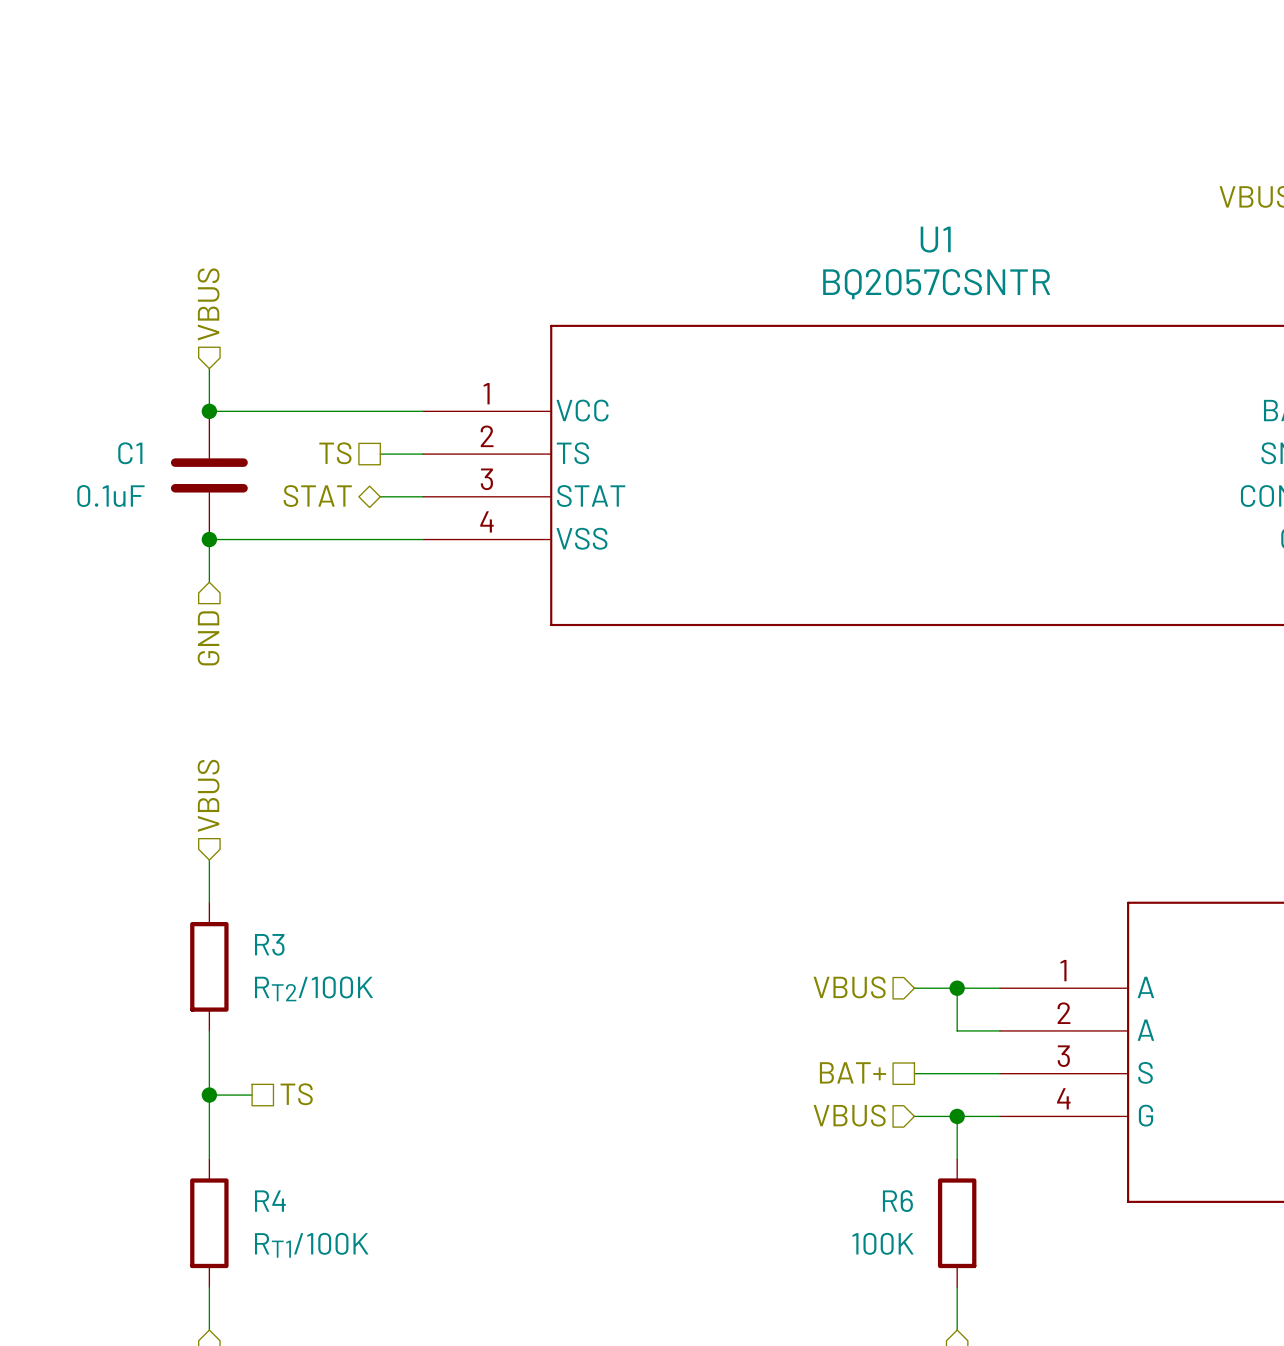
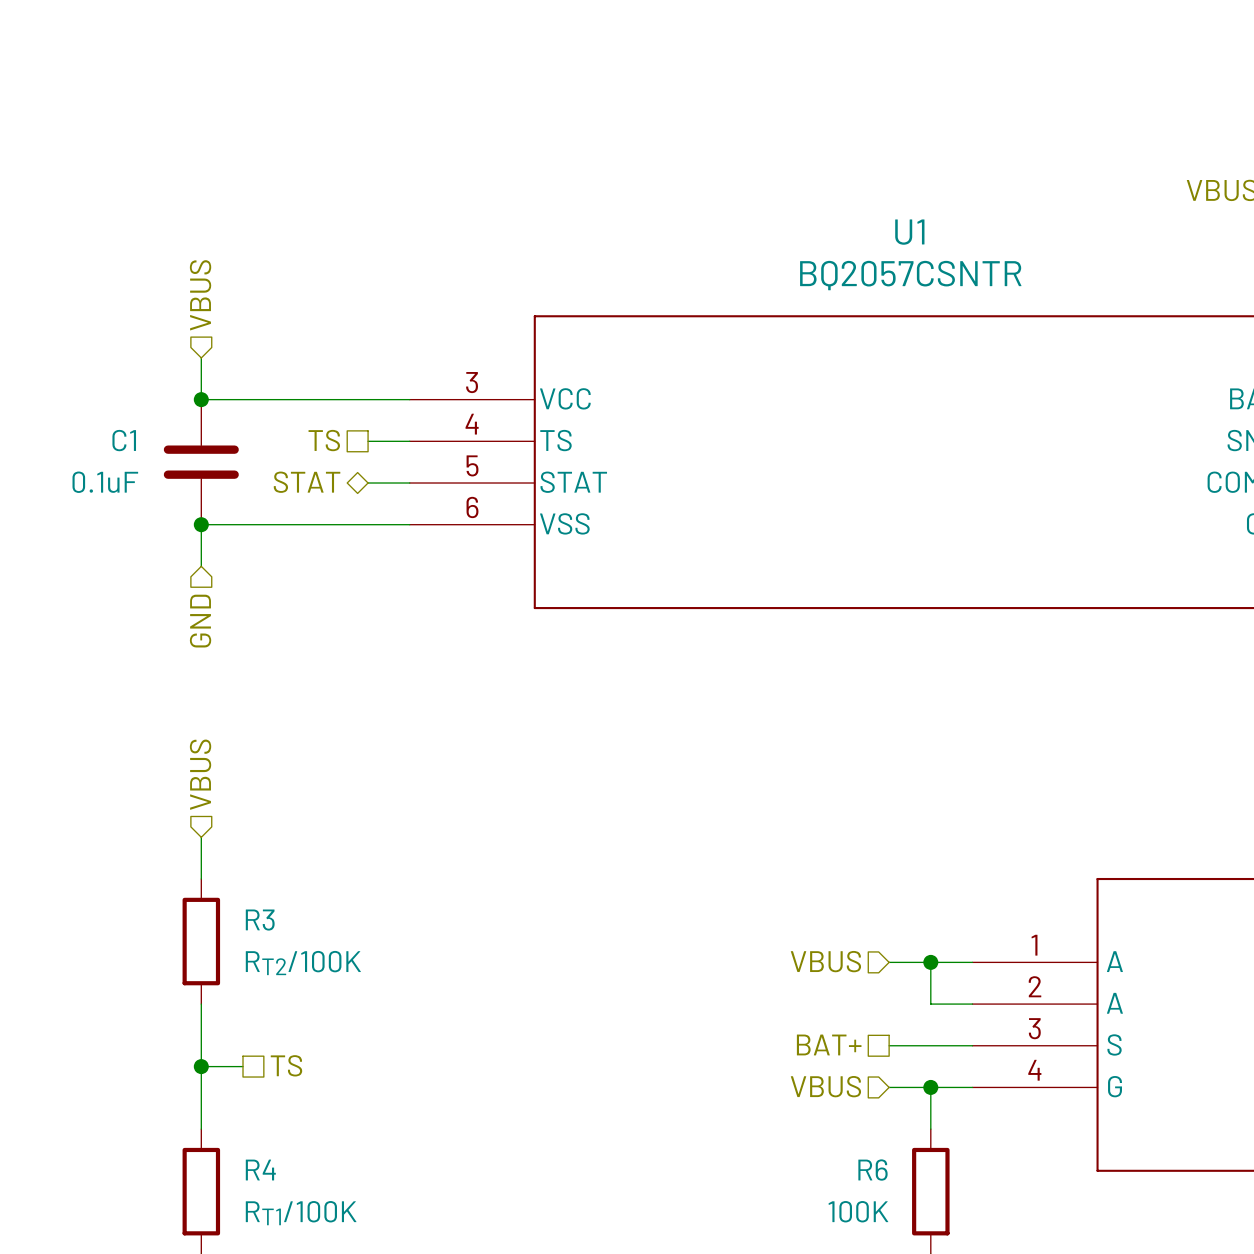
U1 pin number: 1 (486, 393) -> 3 (472, 382)
U1 pin number: 2 (487, 436) -> 4 (472, 424)
U1 pin number: 3 (486, 479) -> 5 (472, 465)
U1 pin number: 4 (486, 521) -> 6 (472, 507)

